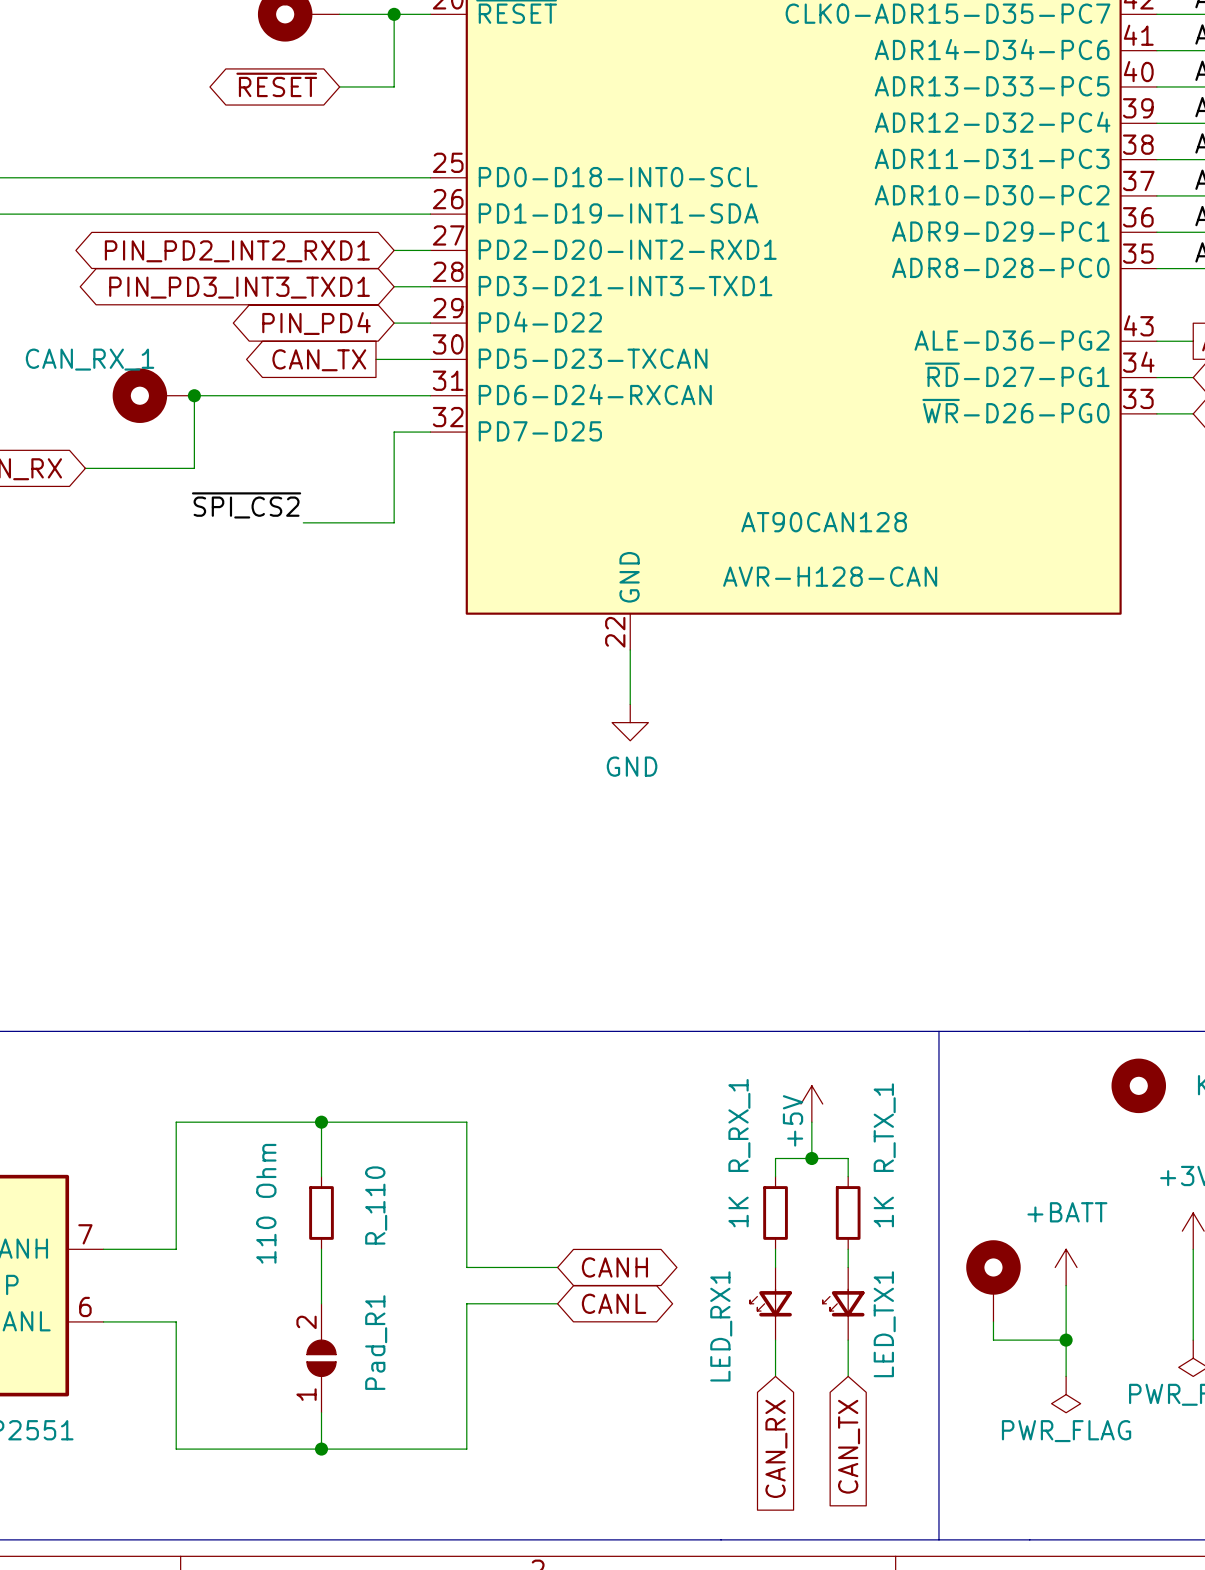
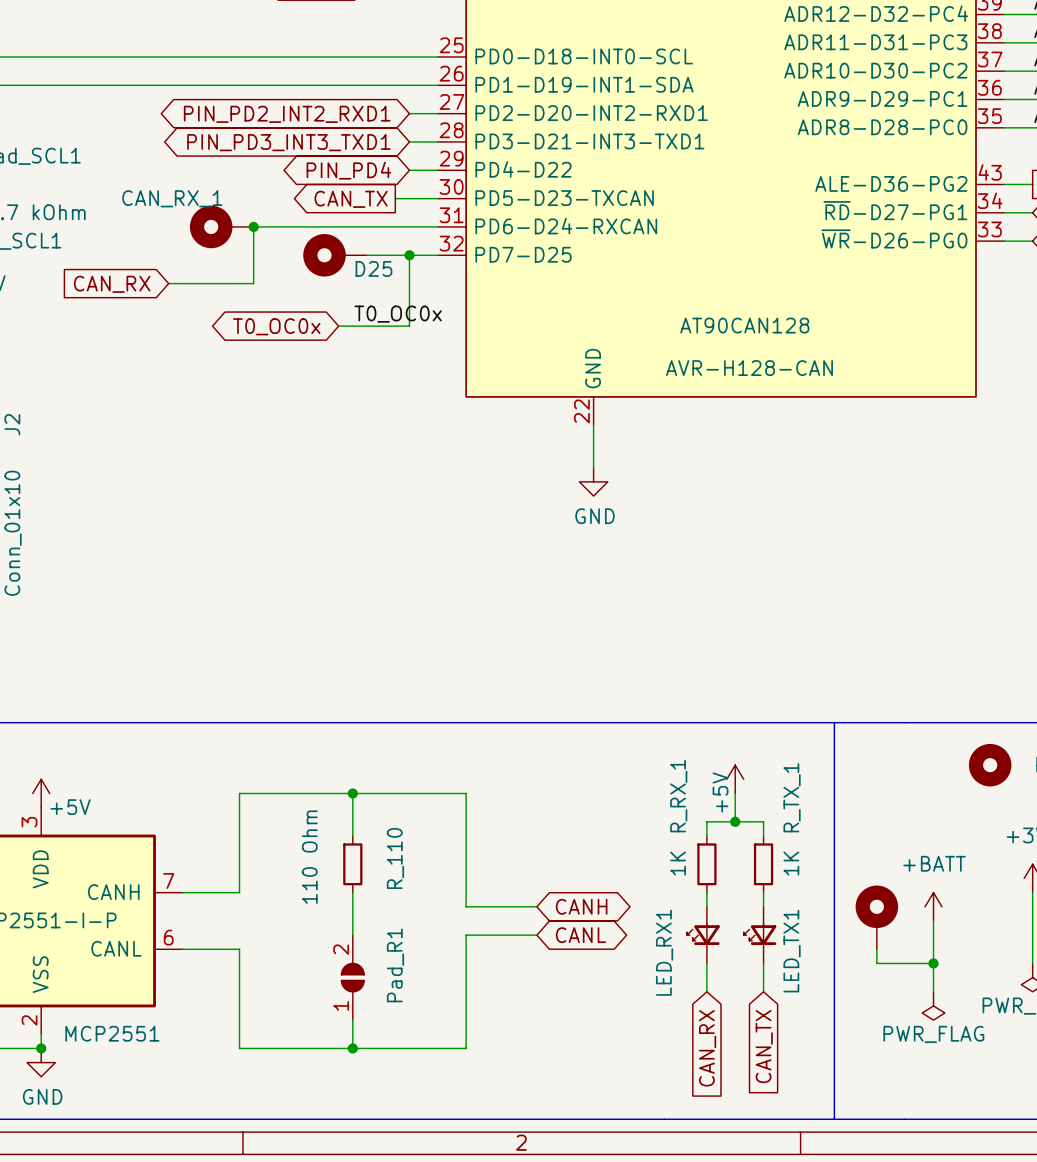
D25: none -> (335, 255)
wire: none -> (366, 255) (409, 255)
junction: none -> (409, 255)
label: ~{SPI_CS2} (246, 505) -> none
label: none -> T0_OC0x (398, 314)
global label: none -> T0_OC0x (276, 326)

